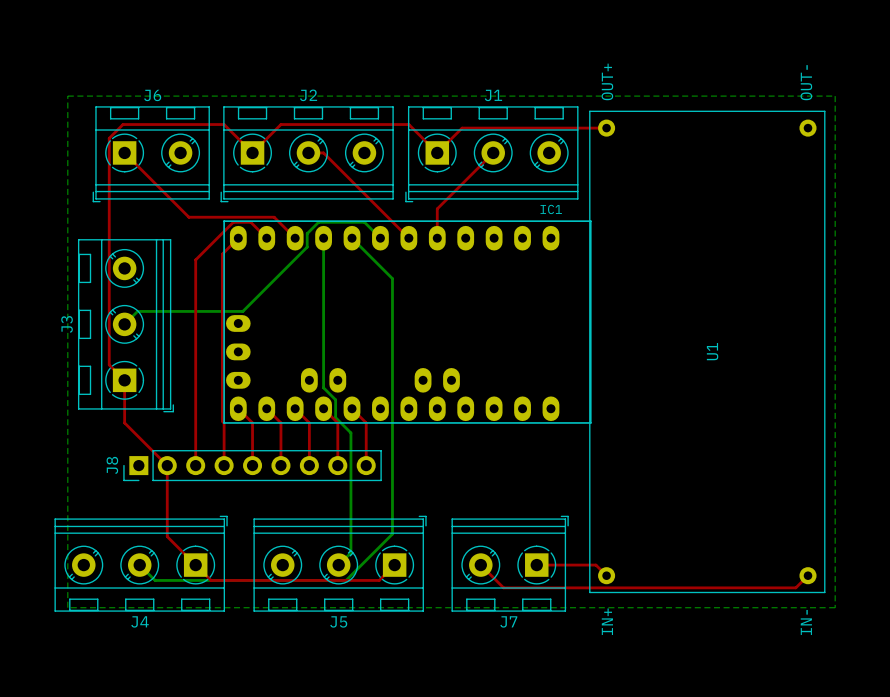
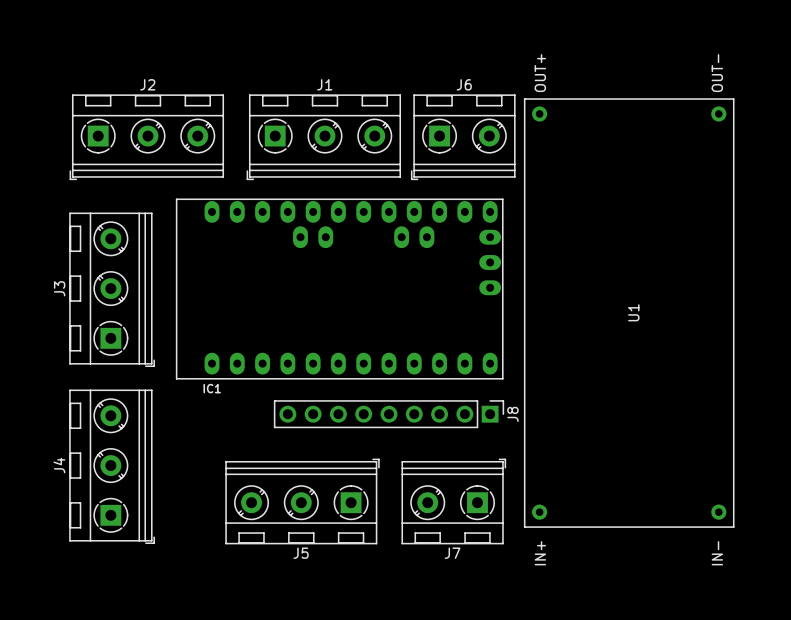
bottom zone outline: (67, 96) (67, 607) (835, 607) (835, 96) (67, 96) -> none
top track: (606, 128) (462, 128) (437, 152) (408, 124) (280, 124) (252, 152) (224, 124) (123, 124) (109, 138) (109, 364) (124, 380) (124, 422) (167, 465) (167, 536) (211, 580) (379, 580) (394, 565) -> none
top track: (124, 152) (188, 217) (274, 217) (295, 238) -> none
top track: (308, 152) (323, 152) (408, 238) -> none
top track: (493, 152) (437, 208) (437, 238) -> none
J6 position: (151, 154) -> (463, 137)
J2 position: (307, 154) -> (146, 137)
J1 position: (491, 154) -> (323, 137)
top track: (238, 238) (222, 254) (224, 465) -> none
top track: (266, 238) (250, 222) (233, 222) (195, 259) (195, 465) -> none
bottom track: (323, 238) (323, 387) (335, 399) (335, 417) (350, 432) (350, 552) (338, 565) -> none
bottom track: (352, 238) (392, 278) (392, 534) (346, 580) (155, 580) (139, 565) -> none
bottom track: (380, 238) (364, 222) (318, 222) (307, 233) (307, 247) (242, 311) (137, 311) (124, 324) -> none
IC1 rotation: 0° (407, 322) -> 180° (339, 289)
top track: (238, 408) (252, 422) (252, 465) -> none
top track: (266, 408) (280, 422) (280, 465) -> none
top track: (295, 408) (309, 422) (309, 465) -> none
top track: (323, 408) (337, 422) (337, 465) -> none
top track: (352, 408) (366, 422) (366, 465) -> none
J8 rotation: 0° (252, 465) -> 180° (389, 414)
J8 position: (252, 465) -> (389, 414)
J4 rotation: 0° (141, 563) -> 90° clockwise (112, 466)
top track: (480, 565) (503, 587) (795, 587) (808, 575) -> none
top track: (536, 565) (595, 565) (606, 575) -> none

